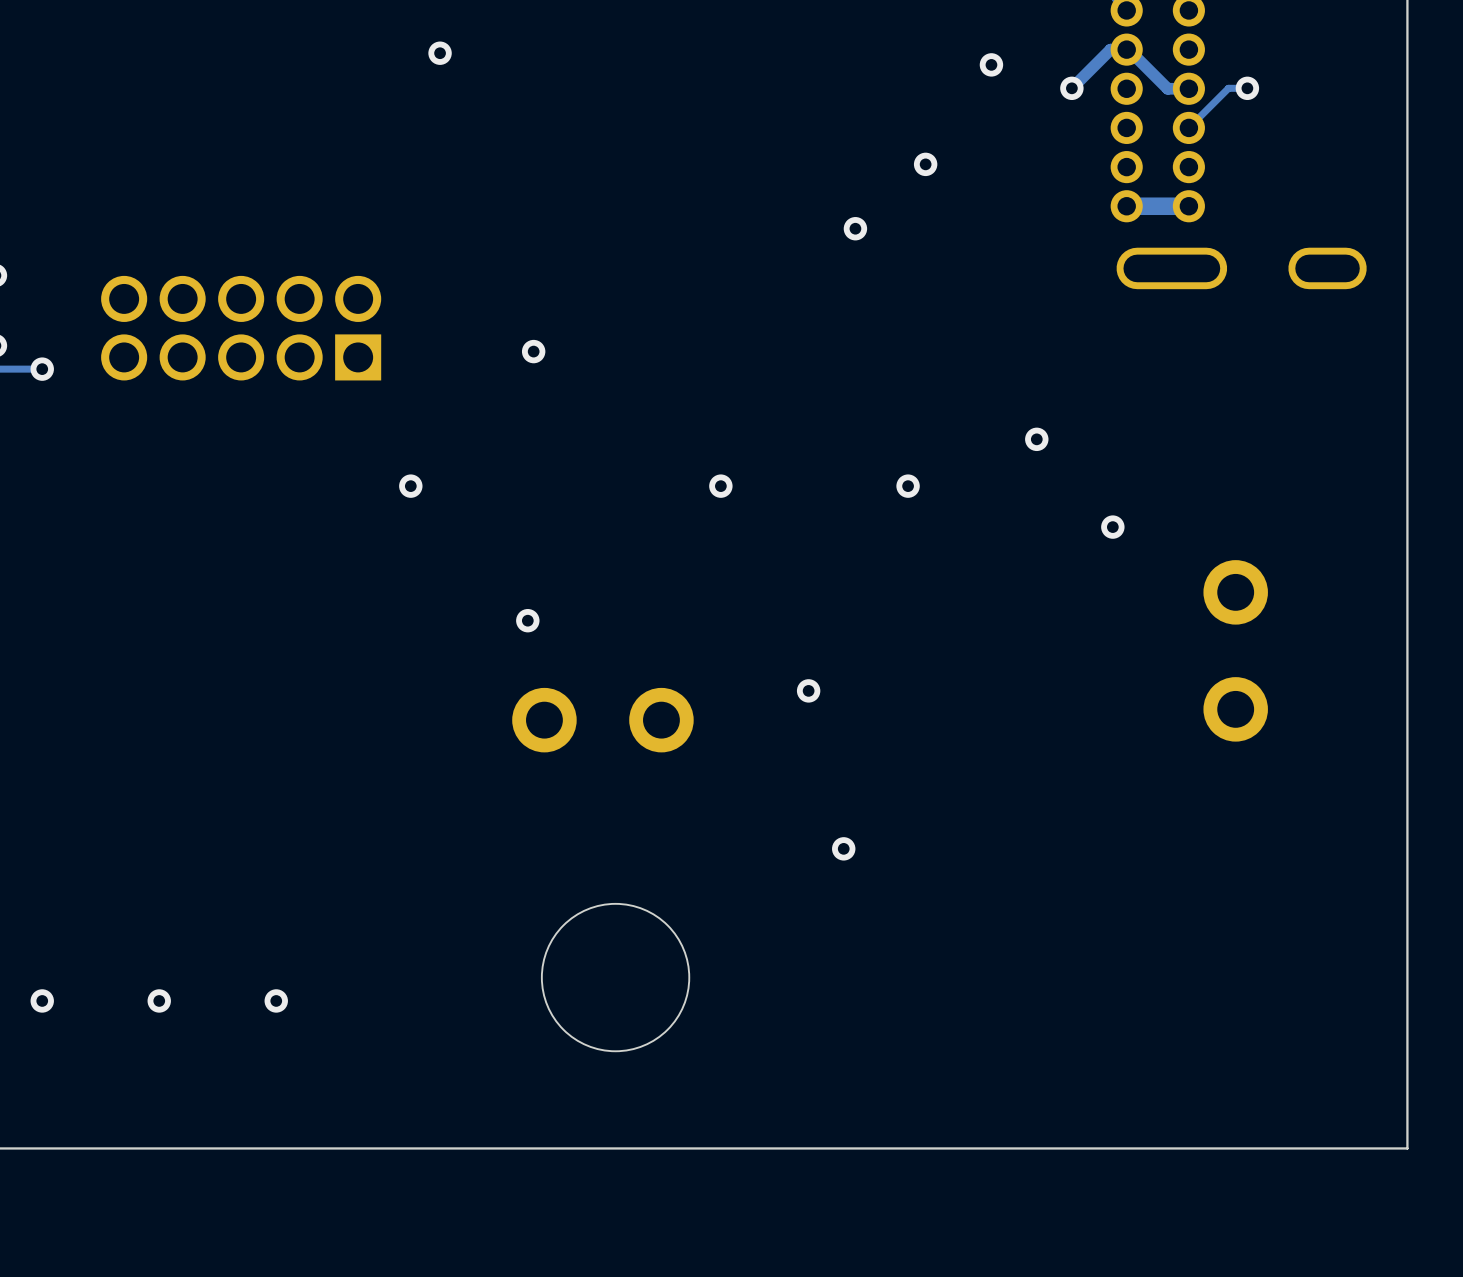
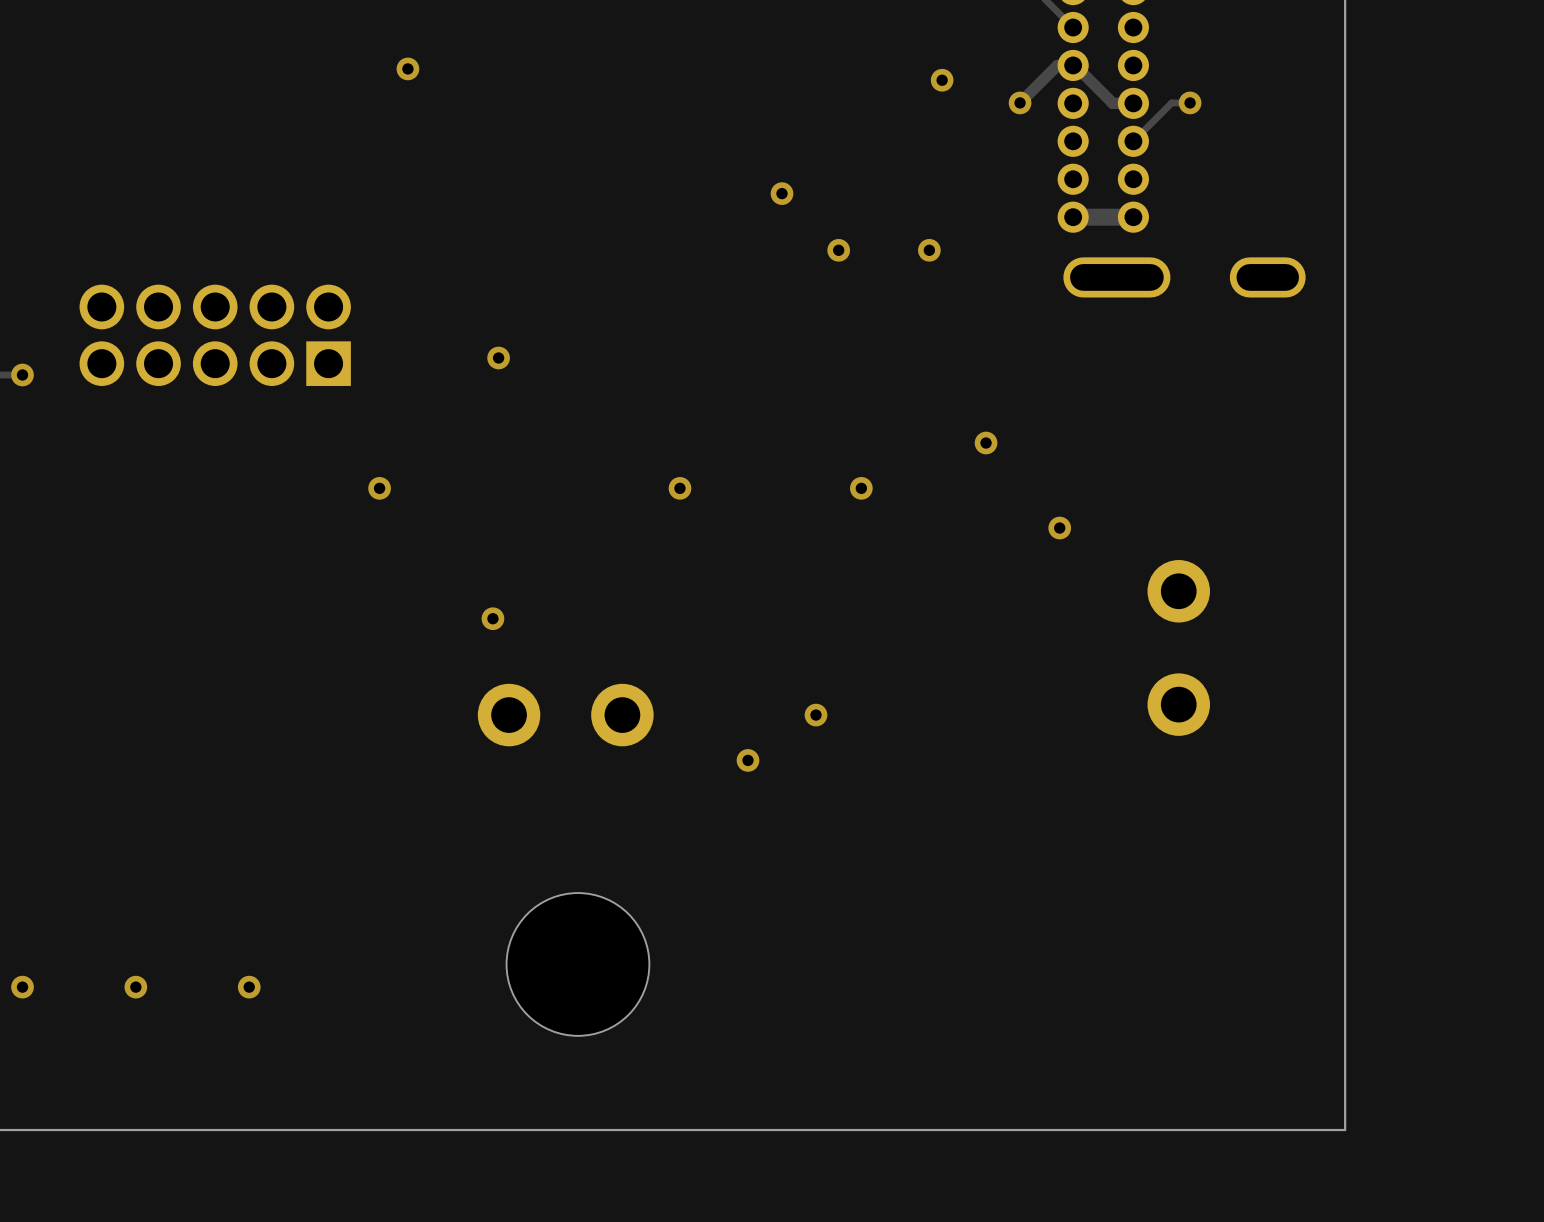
via: (925, 164) -> none
via: none -> (782, 193)
via: (855, 228) -> none
via: none -> (838, 250)
via: none -> (929, 250)
via: (808, 690) -> none
via: none -> (816, 715)
via: none -> (748, 760)
via: (843, 848) -> none

